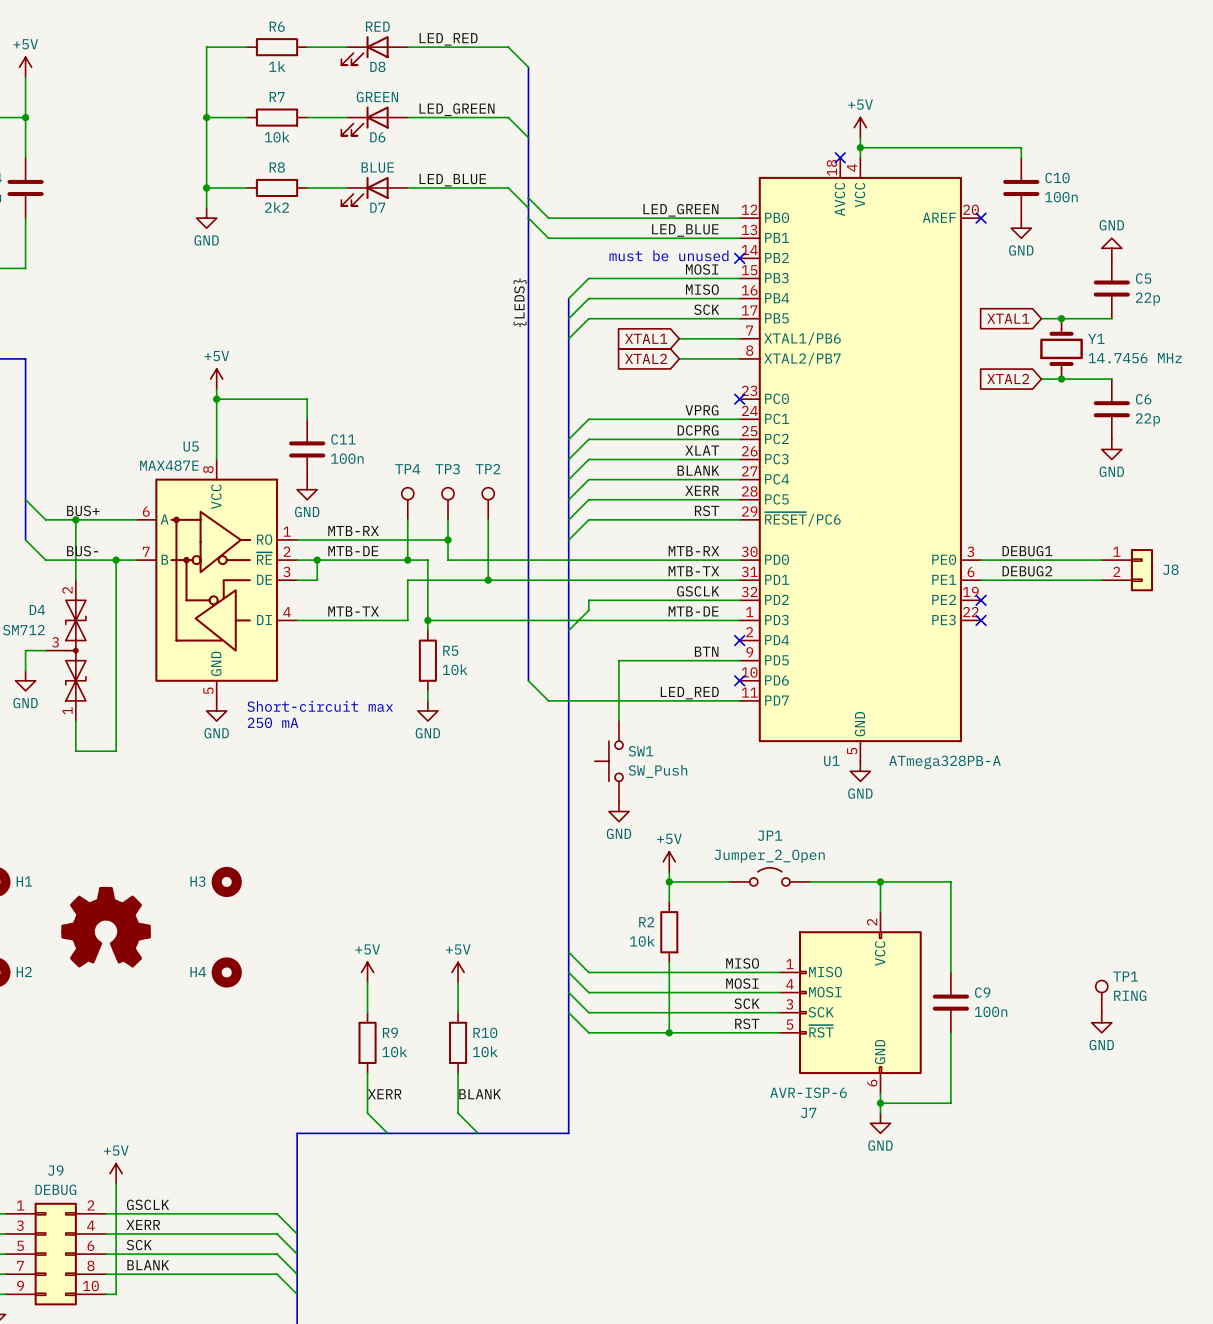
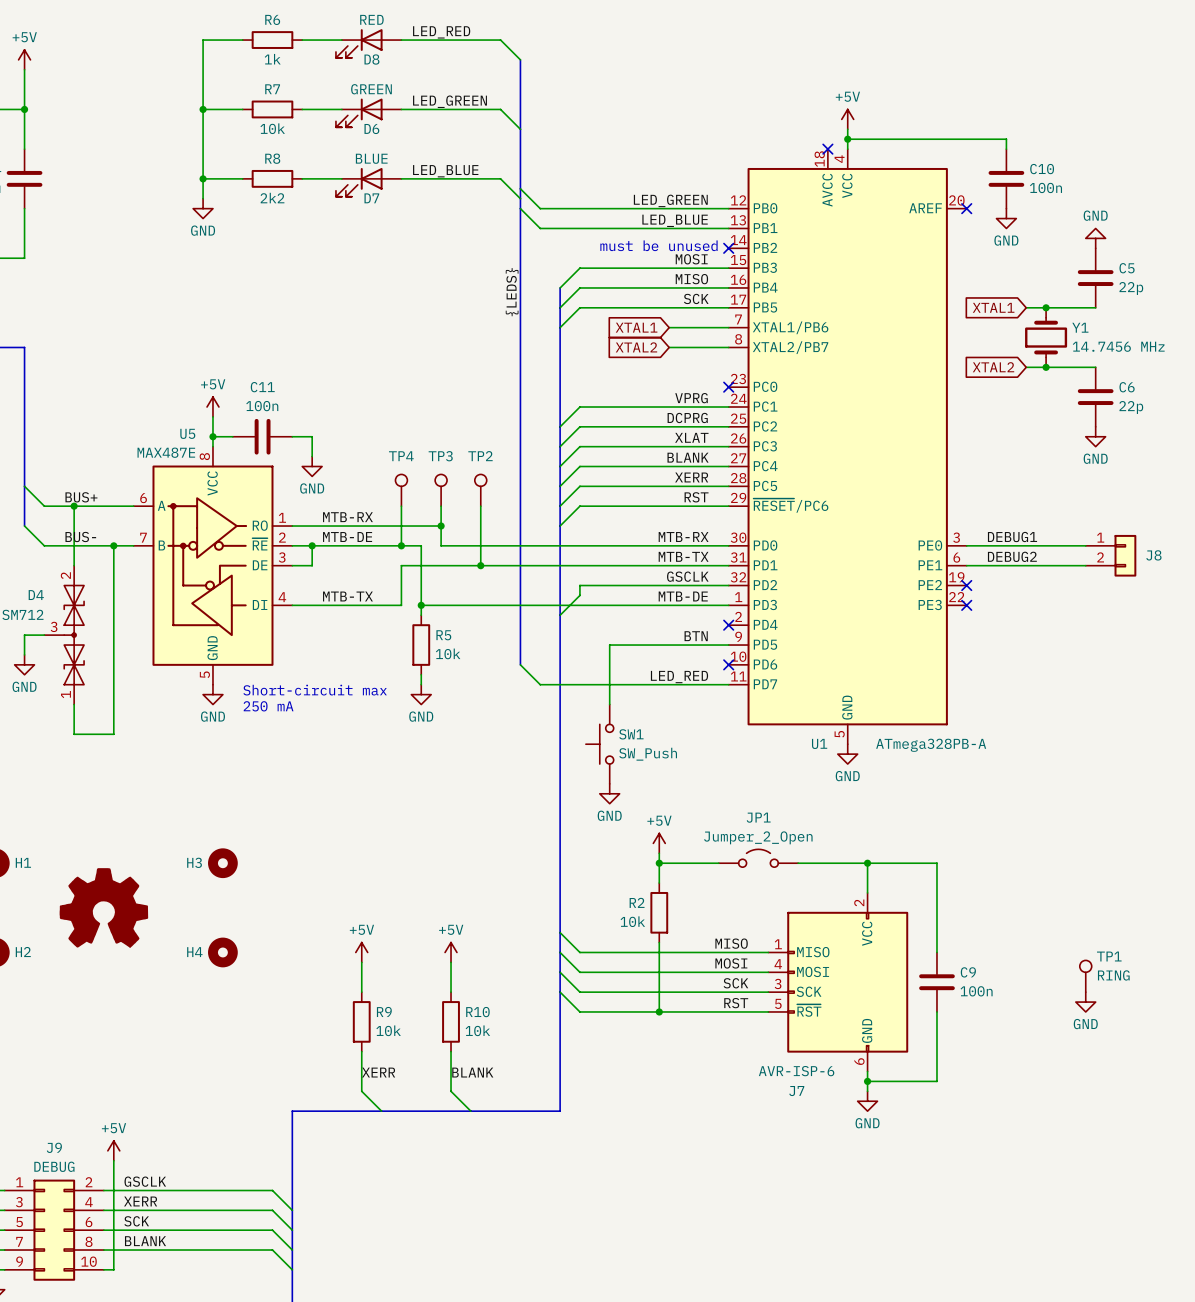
power symbol position: +5V (216, 379) -> +5V (212, 406)
wire: (216, 399) (307, 399) (307, 419) -> none
junction: (216, 399) -> none
C11 name position: C11 (343, 439) -> C11 (262, 387)
wire: none -> (212, 436) (232, 436)
junction: none -> (212, 436)
wire: none -> (292, 436) (312, 436) (312, 456)
C11 rotation: 0° (307, 449) -> 90° clockwise (262, 436)
C11 position: (307, 449) -> (262, 436)
C11 value position: 100n (347, 458) -> 100n (262, 406)
power symbol position: GND (307, 489) -> GND (312, 466)

